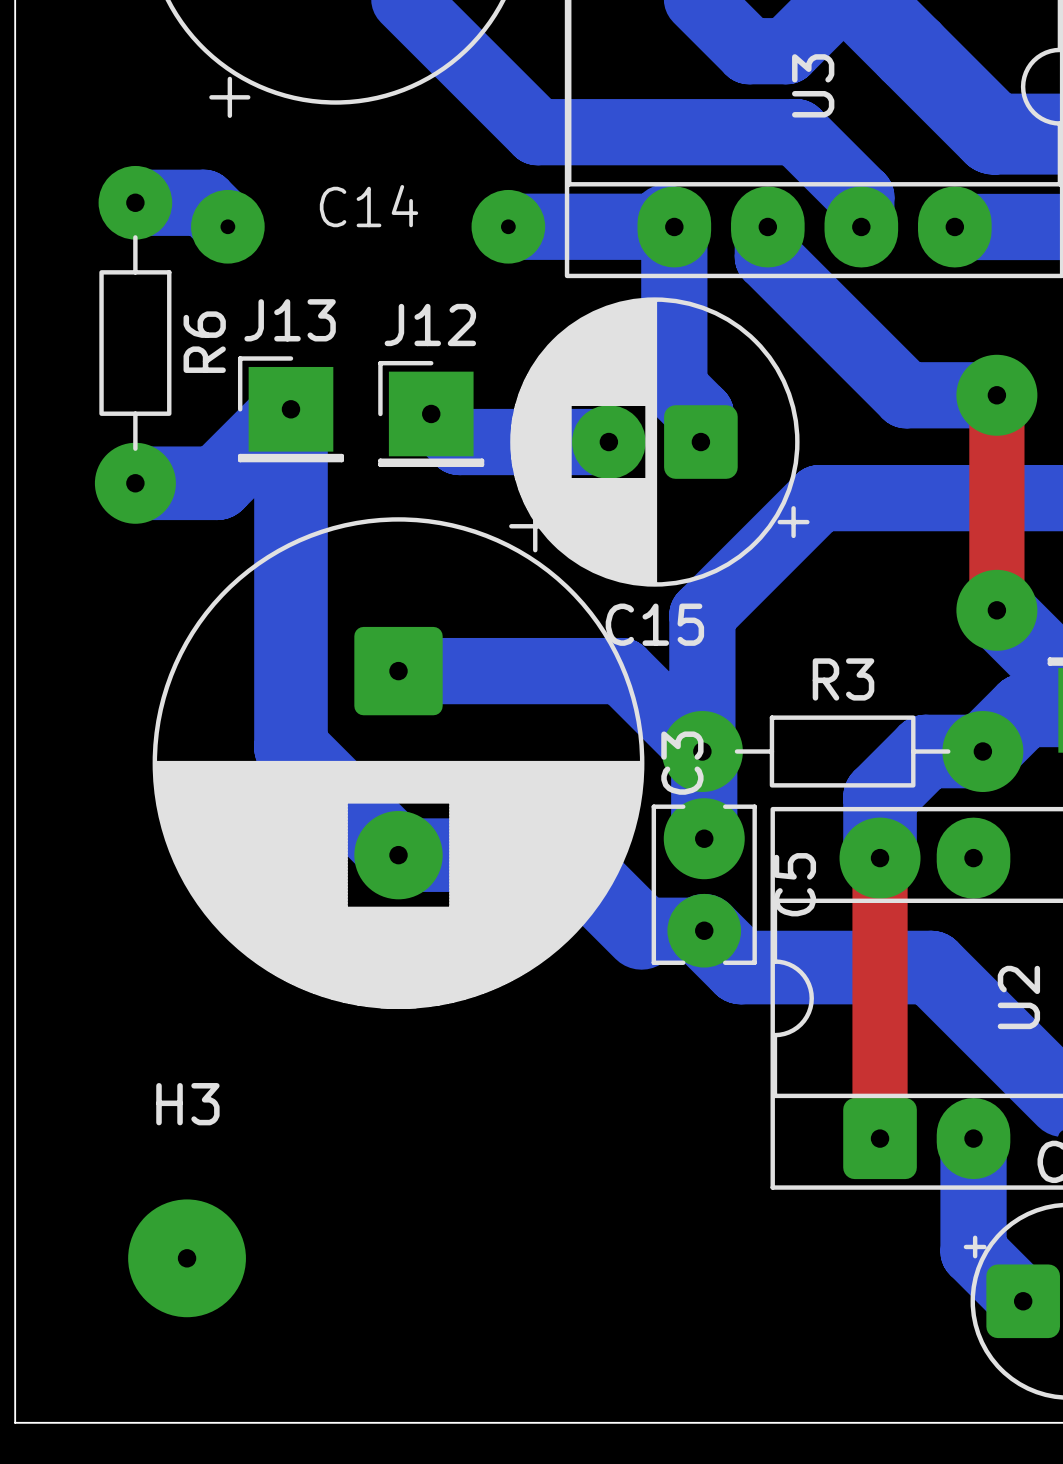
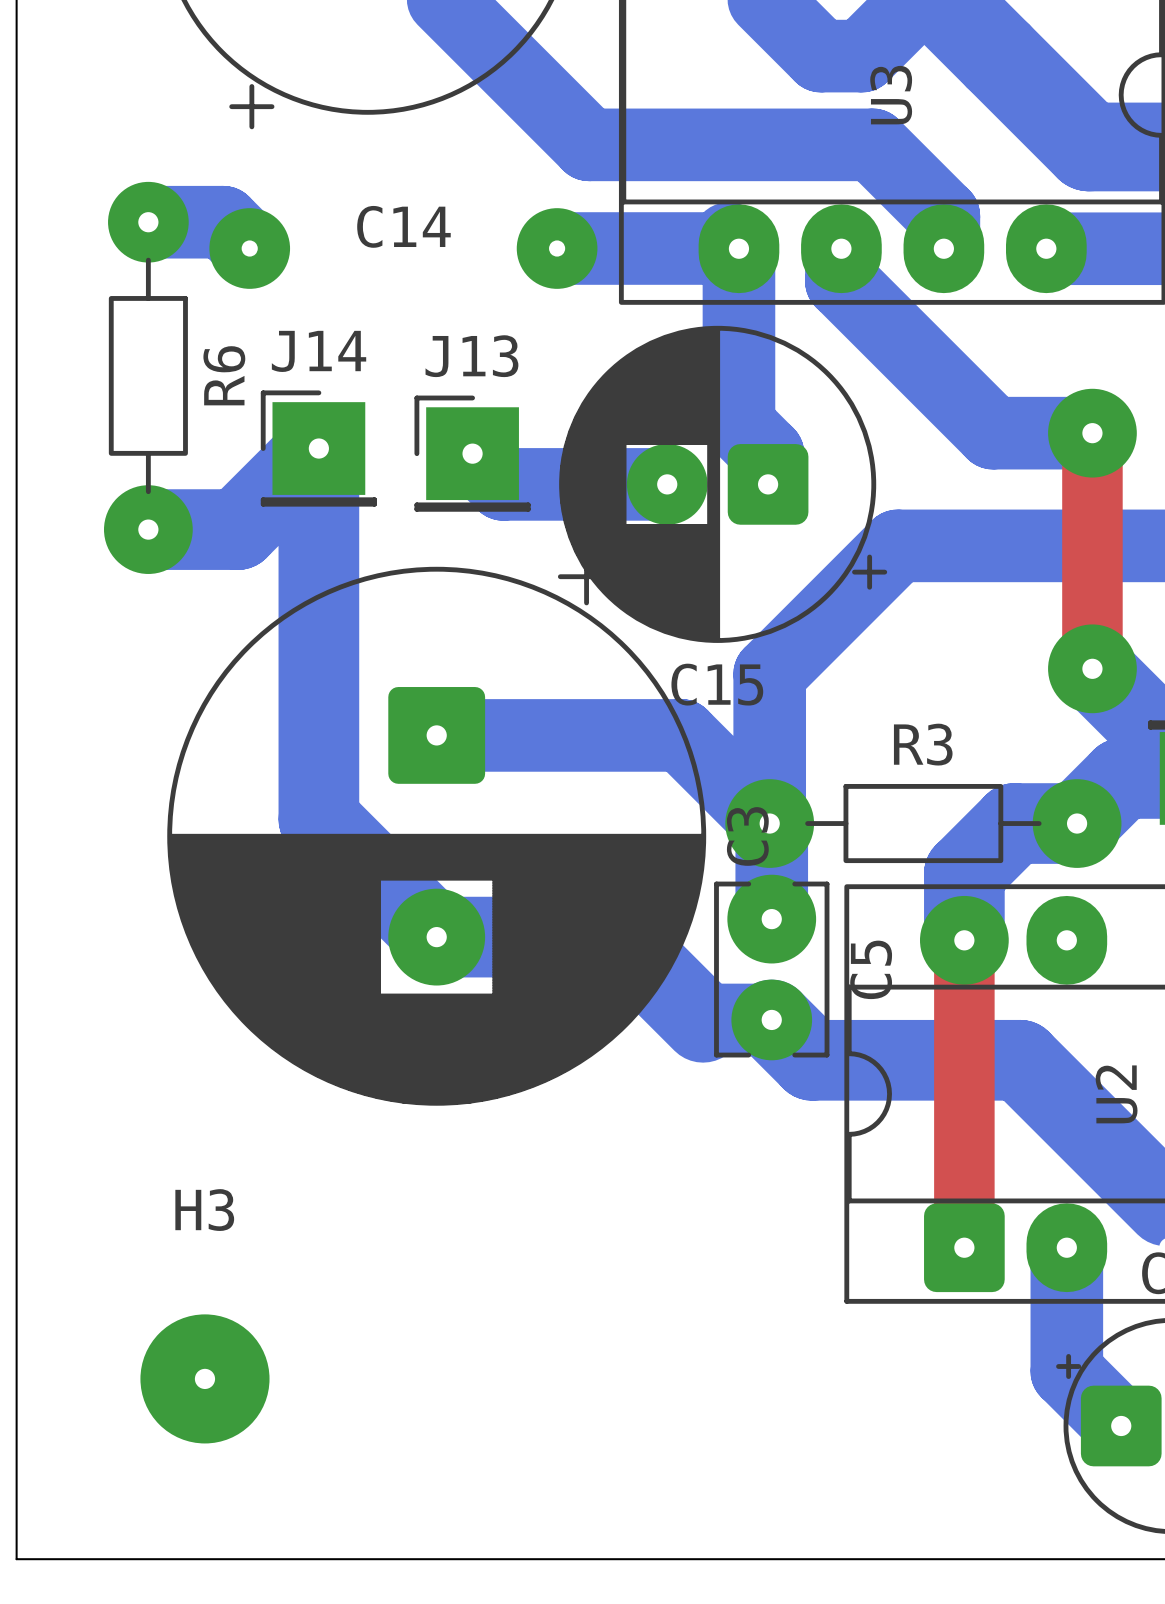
J13 name: J13 (290, 320) -> J14 (319, 351)
J12 name: J12 (430, 324) -> J13 (471, 356)

